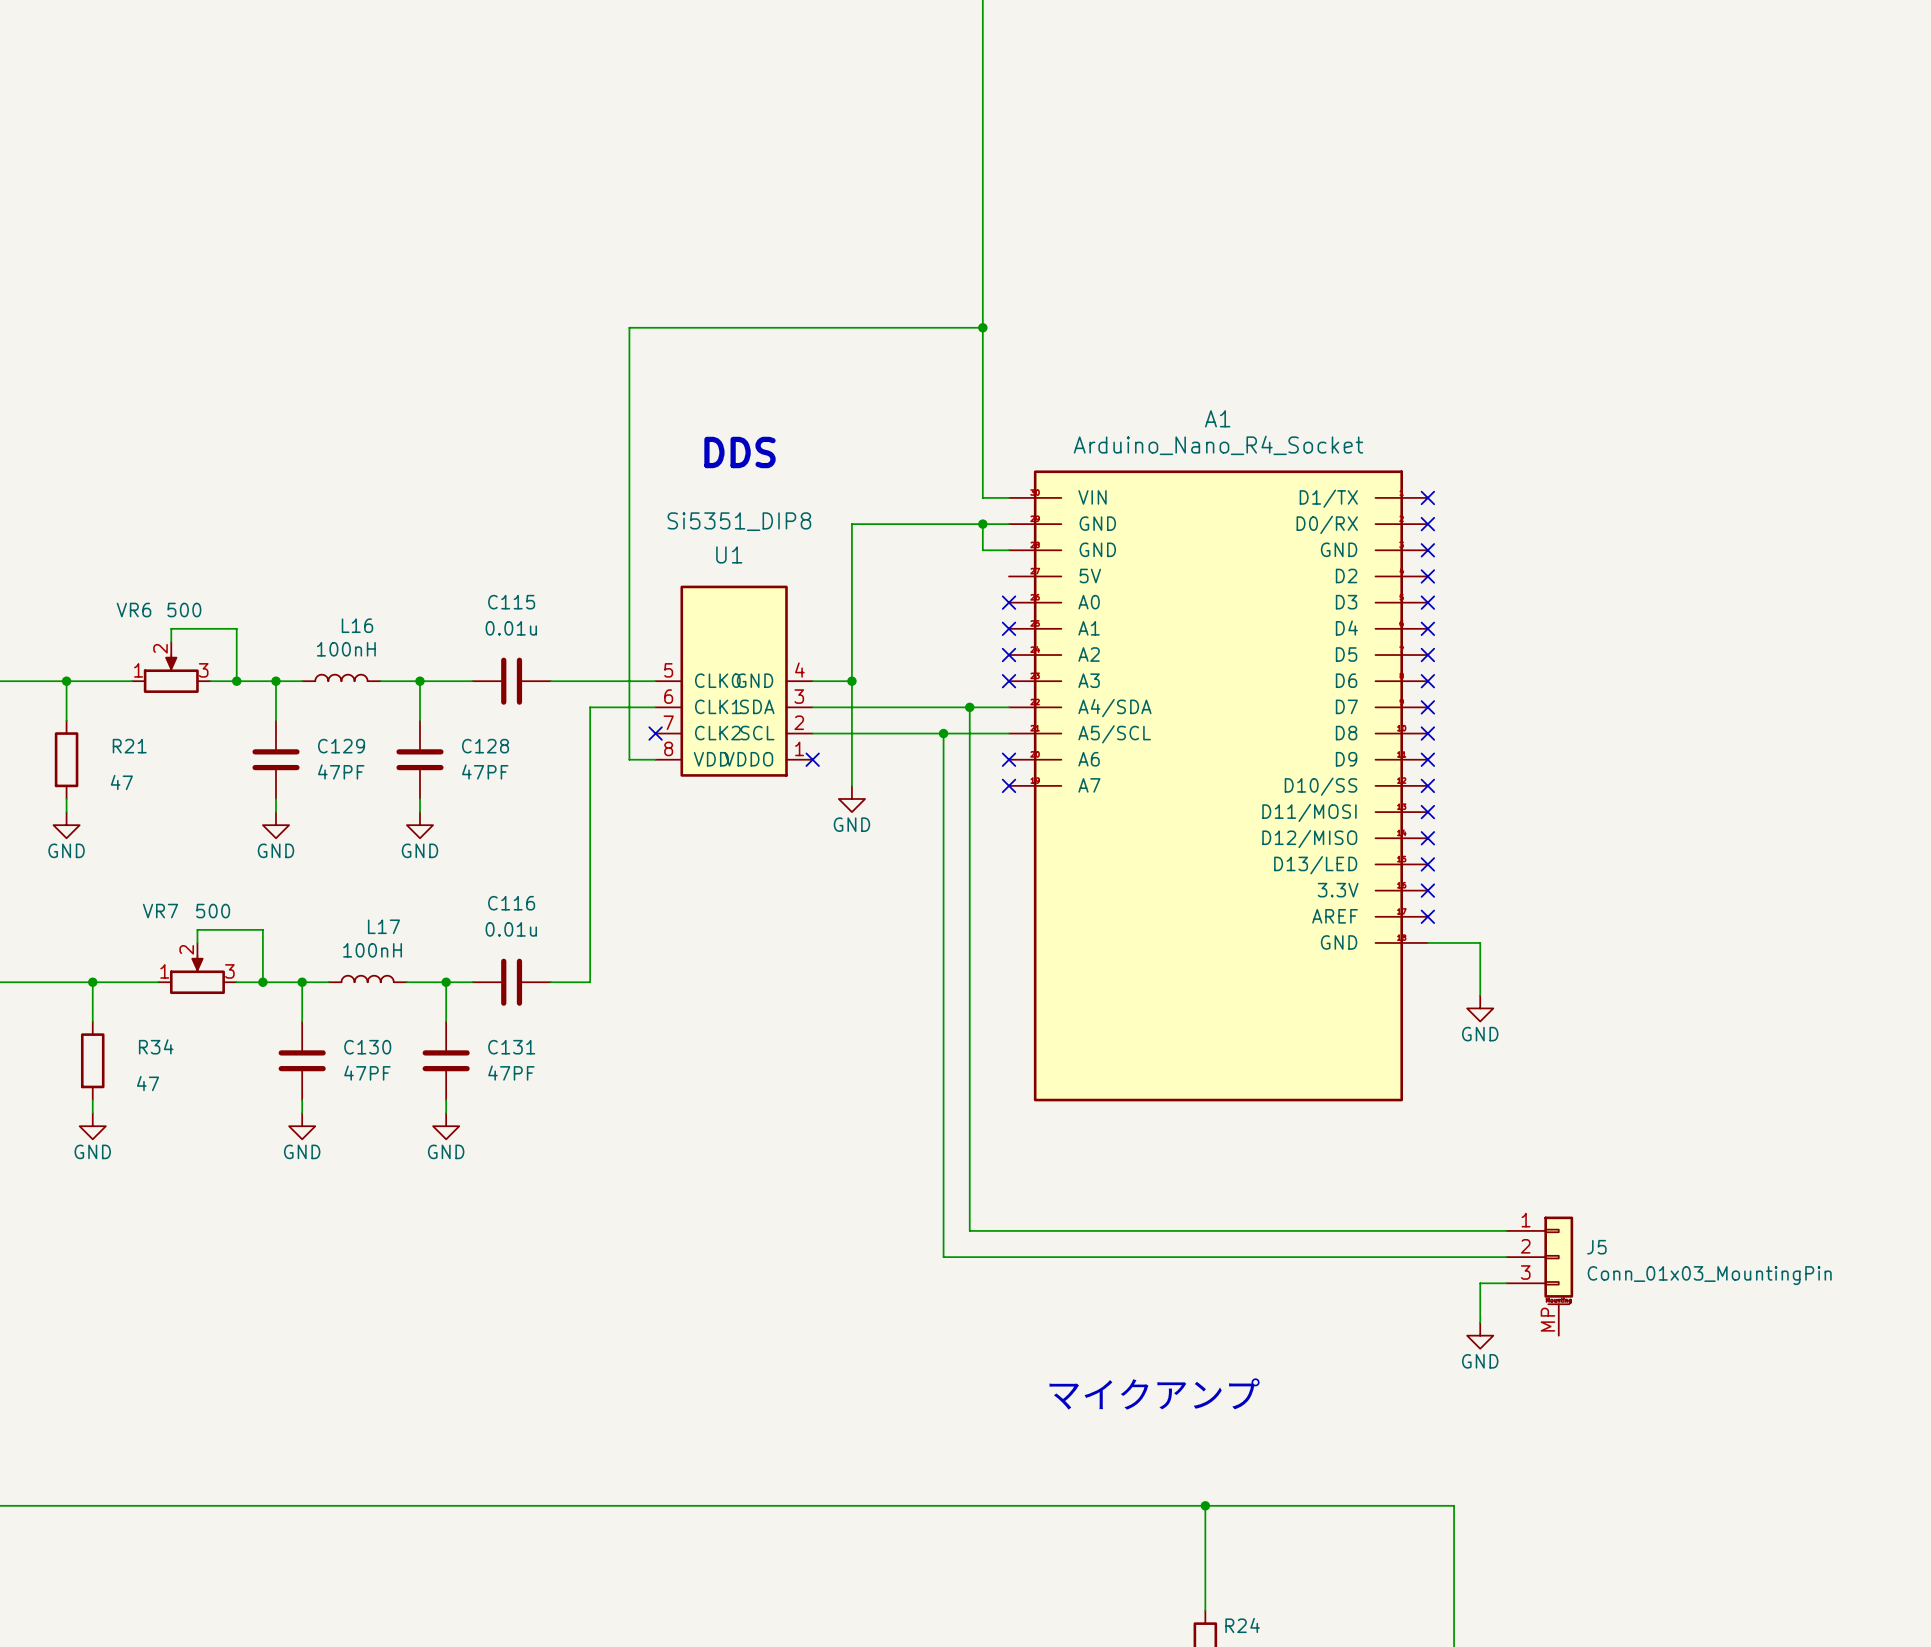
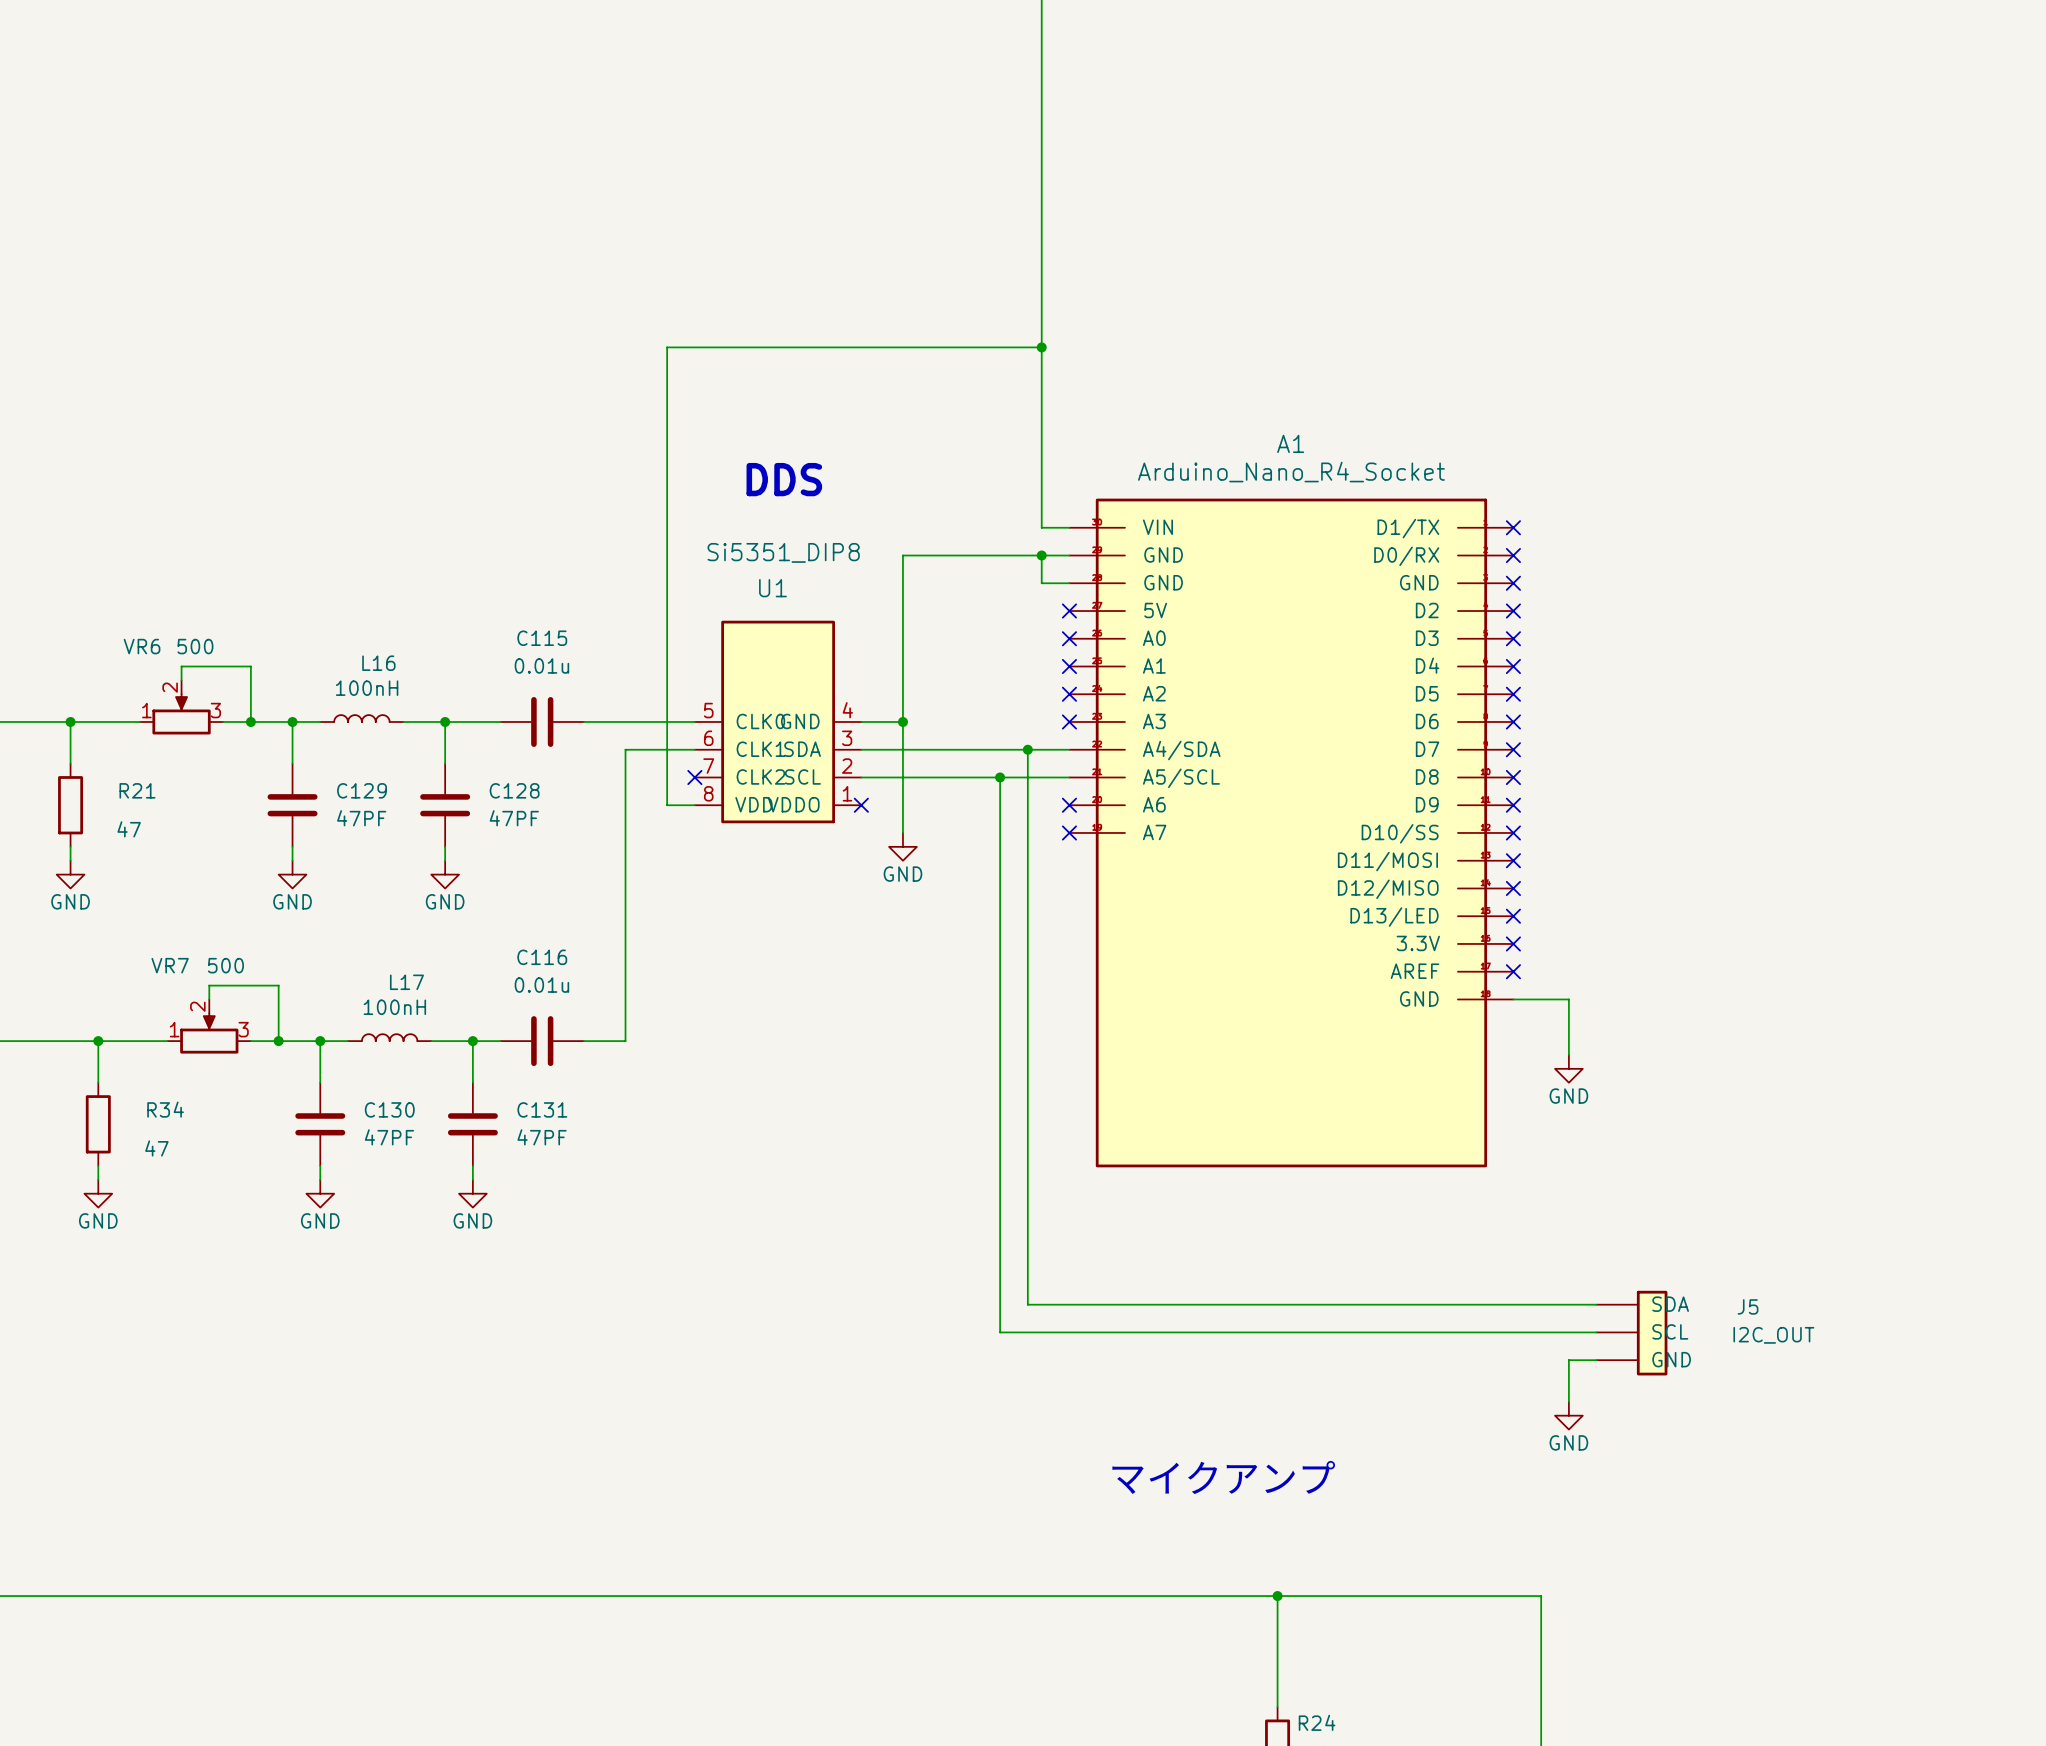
no-connect mark: none -> (1069, 611)
J5 symbol: [1506, 1216, 1574, 1336] -> [1596, 1290, 1668, 1376]
J5 name position: J5 (1596, 1247) -> J5 (1748, 1306)
J5 value: Conn_01x03_MountingPin (1709, 1275) -> I2C_OUT (1773, 1335)

